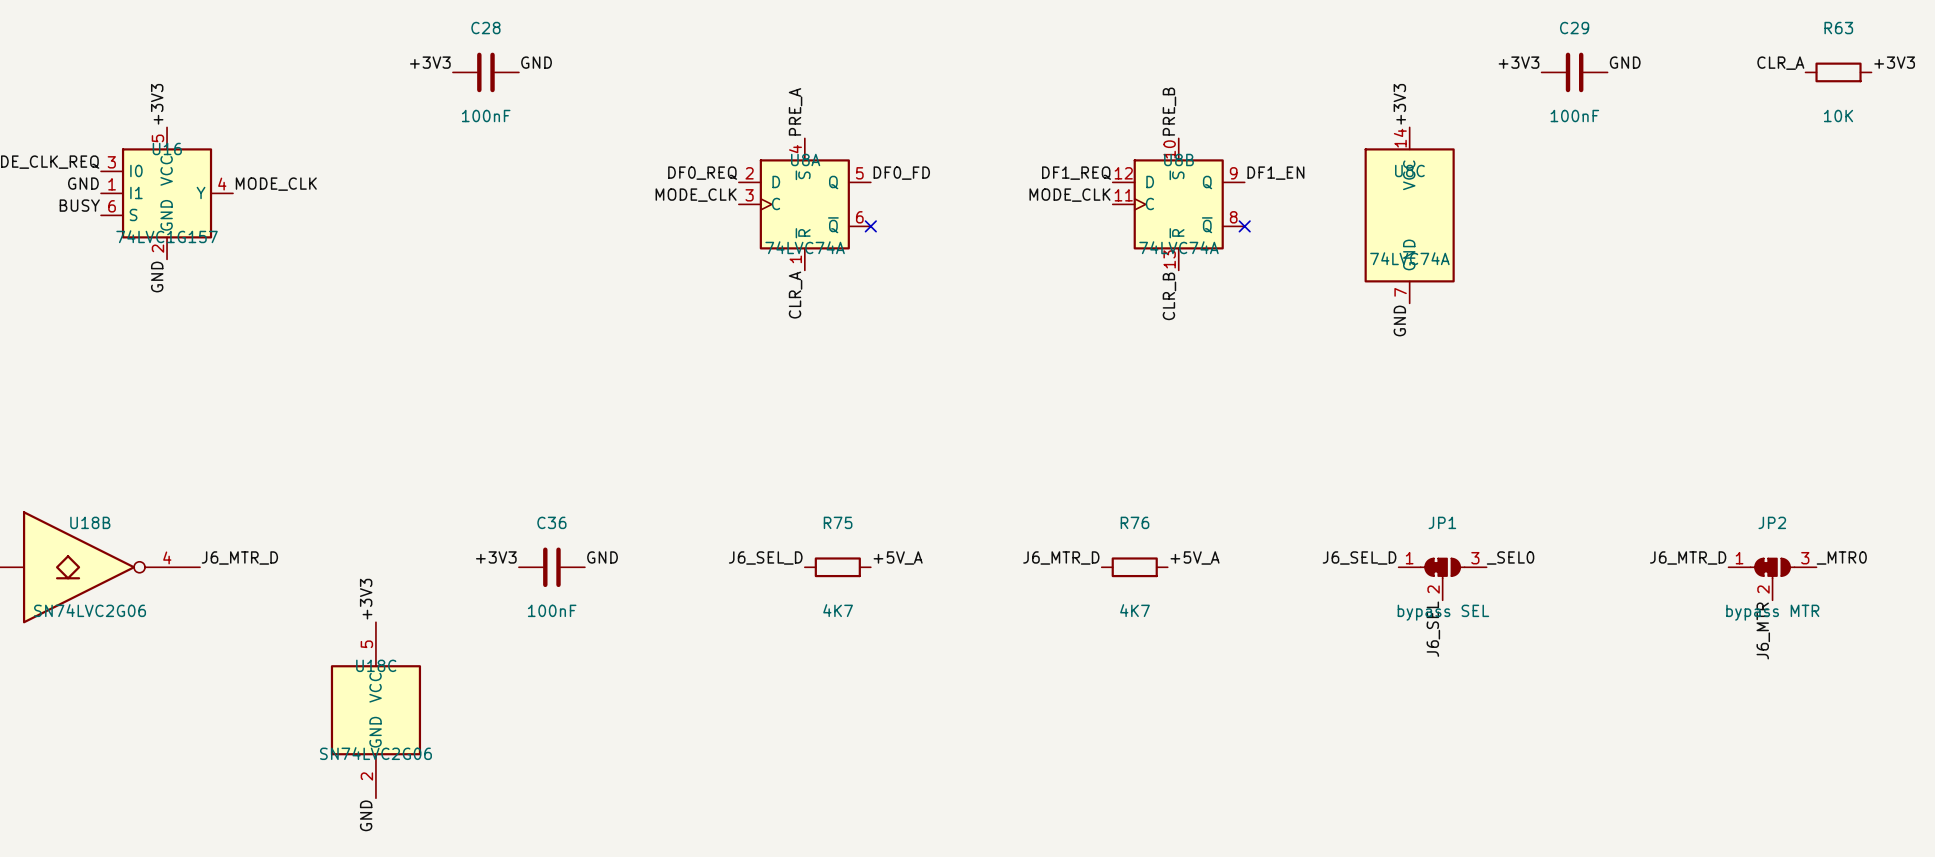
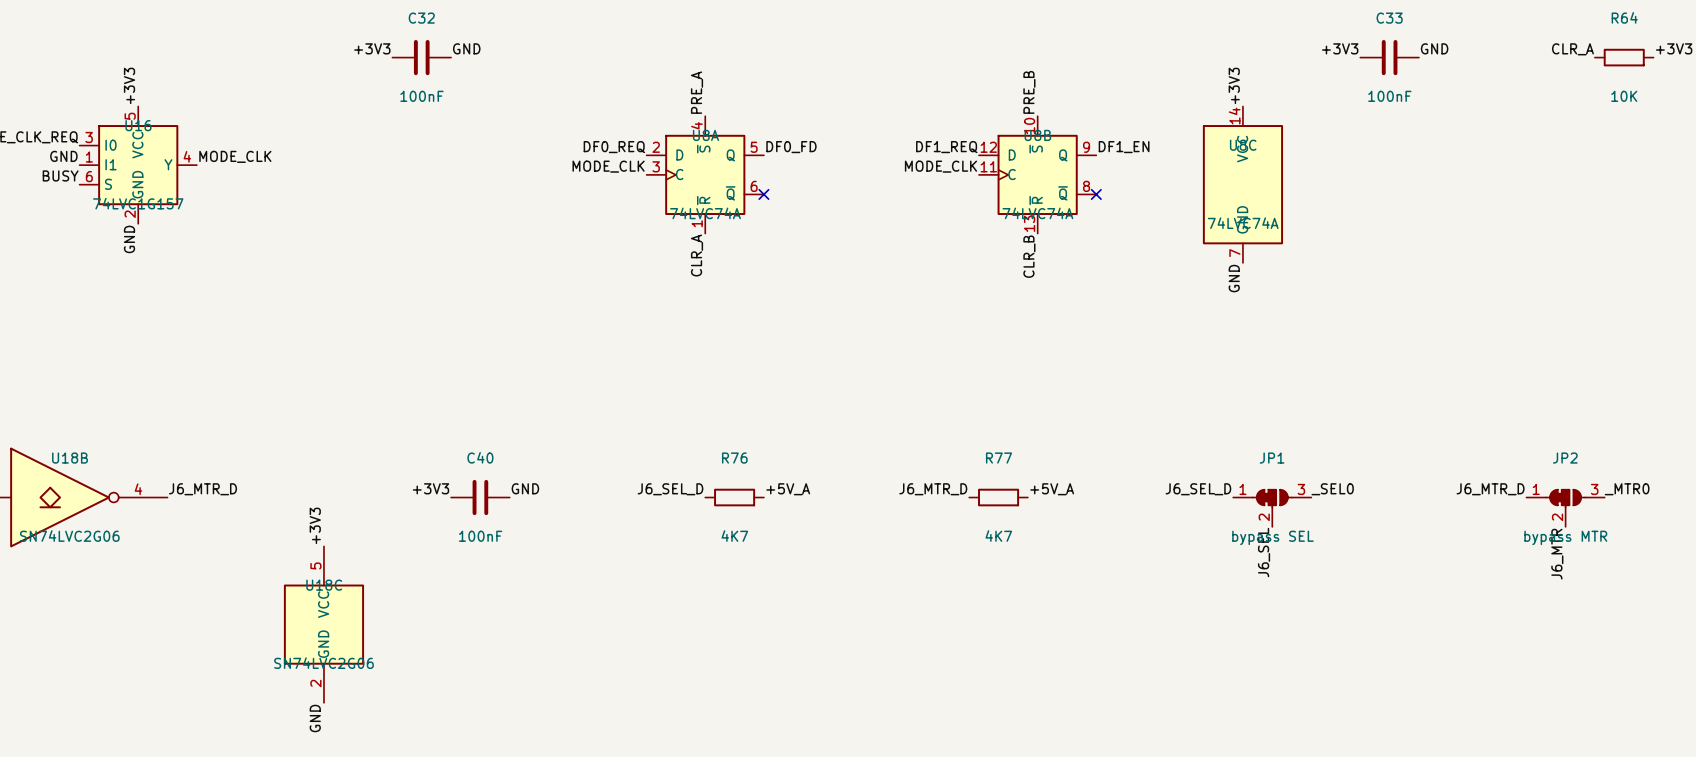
C28 name: C28 (485, 28) -> C32 (421, 18)
C29 name: C29 (1574, 28) -> C33 (1389, 18)
R63 name: R63 (1838, 28) -> R64 (1624, 17)
C36 name: C36 (551, 522) -> C40 (480, 457)
R75 name: R75 (838, 522) -> R76 (734, 458)
R76 name: R76 (1135, 522) -> R77 (999, 458)

